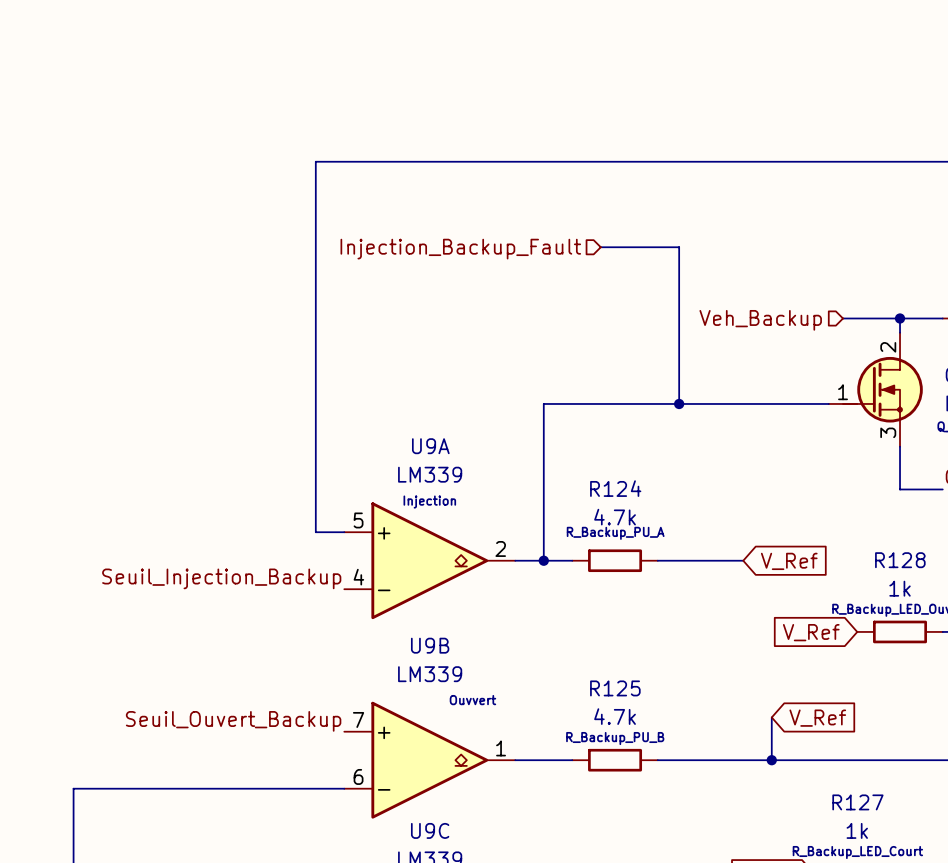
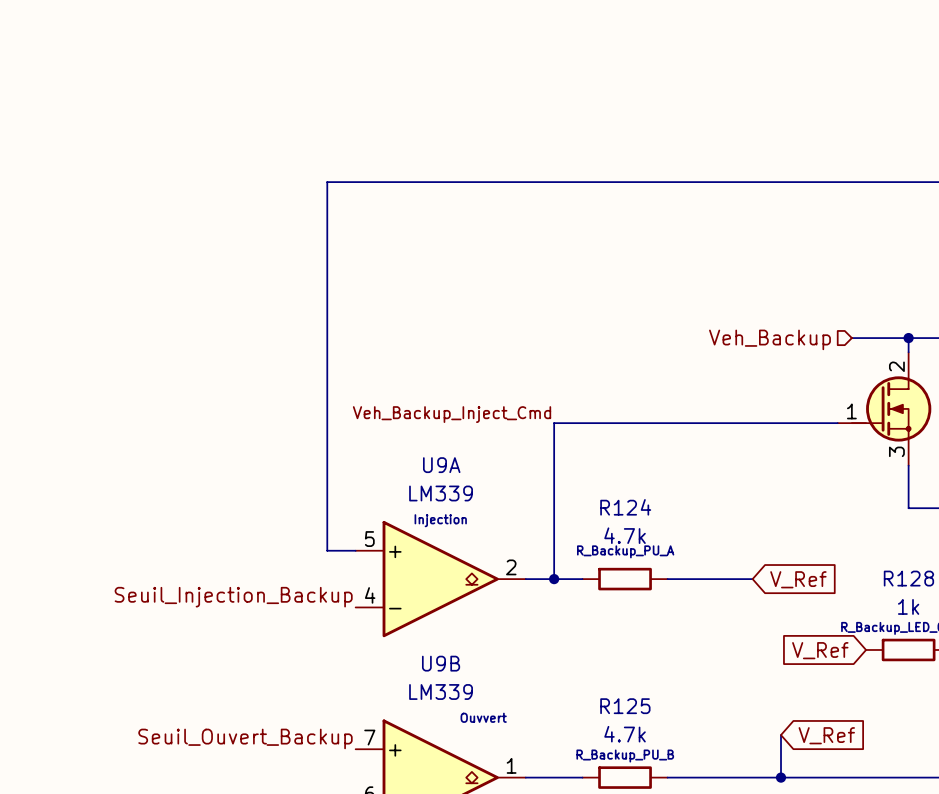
wire: (600, 247) (679, 247) (679, 403) -> none
hierarchical label: Injection_Backup_Fault (460, 249) -> none
label: none -> Veh_Backup_Inject_Cmd (452, 414)
junction: (679, 403) -> none

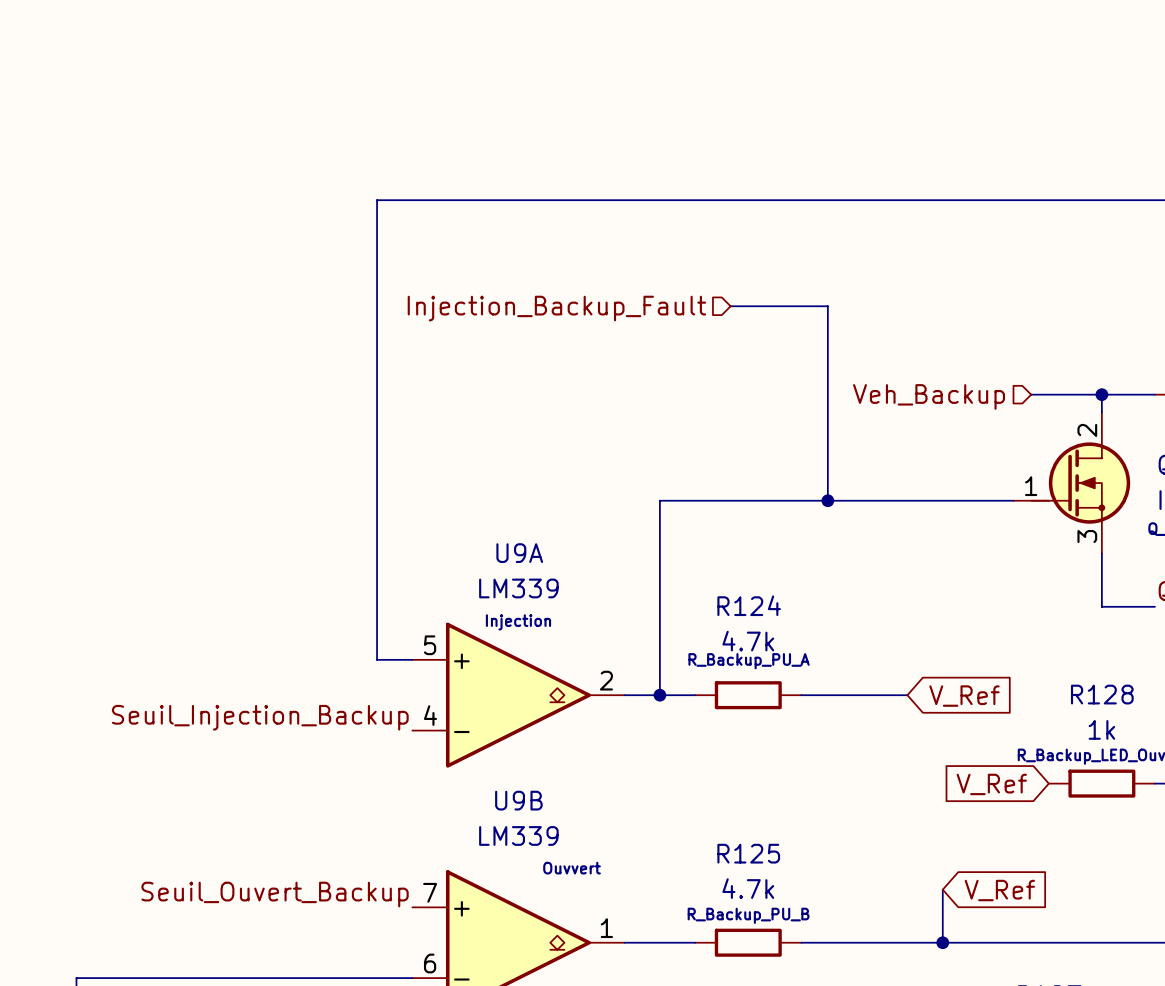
wire: none -> (730, 306) (827, 306) (827, 500)
hierarchical label: none -> Injection_Backup_Fault (556, 308)
label: Veh_Backup_Inject_Cmd (452, 414) -> none
junction: none -> (827, 500)

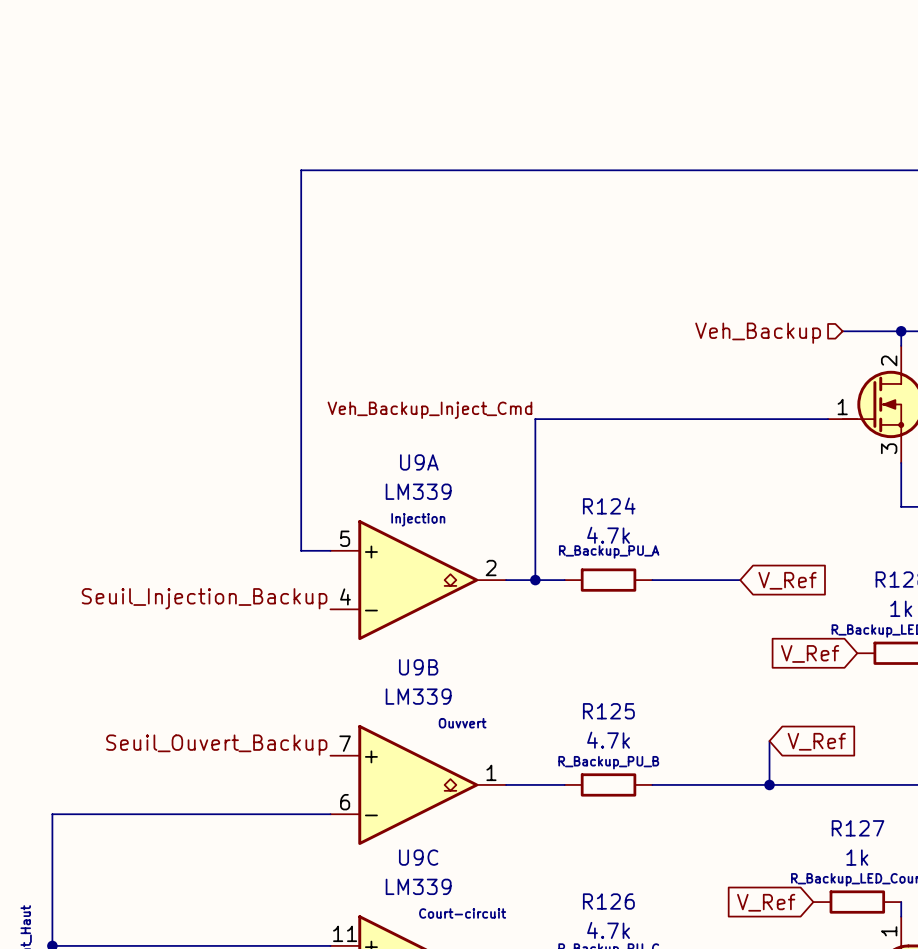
wire: (730, 306) (827, 306) (827, 500) -> none
hierarchical label: Injection_Backup_Fault (556, 308) -> none
label: none -> Veh_Backup_Inject_Cmd (429, 410)
junction: (827, 500) -> none

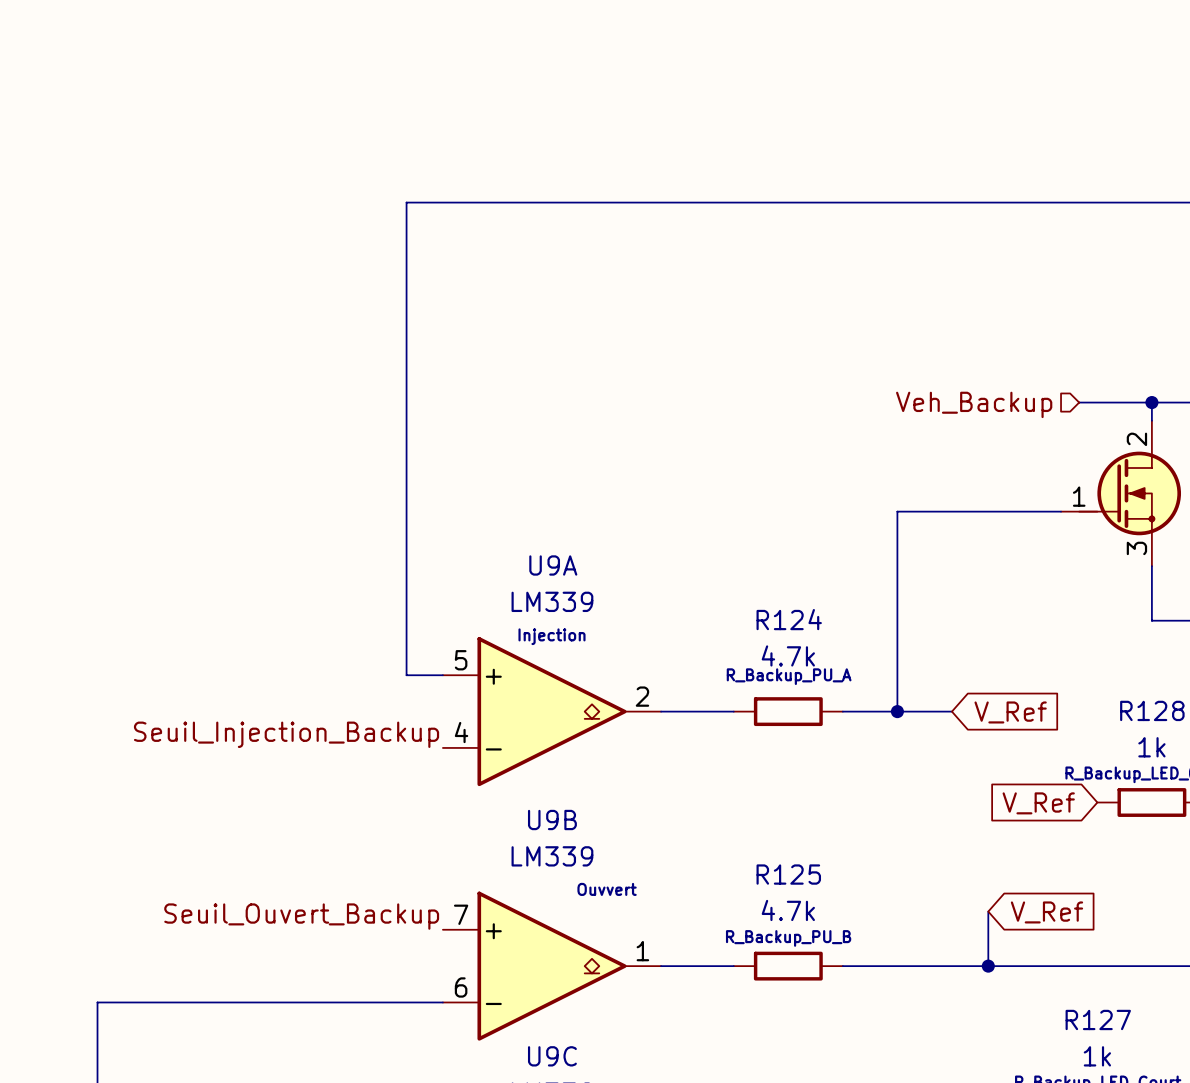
label: Veh_Backup_Inject_Cmd (429, 410) -> none
wire: (696, 419) (535, 419) (535, 580) -> (897, 511) (897, 711)
junction: (535, 580) -> none
junction: none -> (897, 711)

